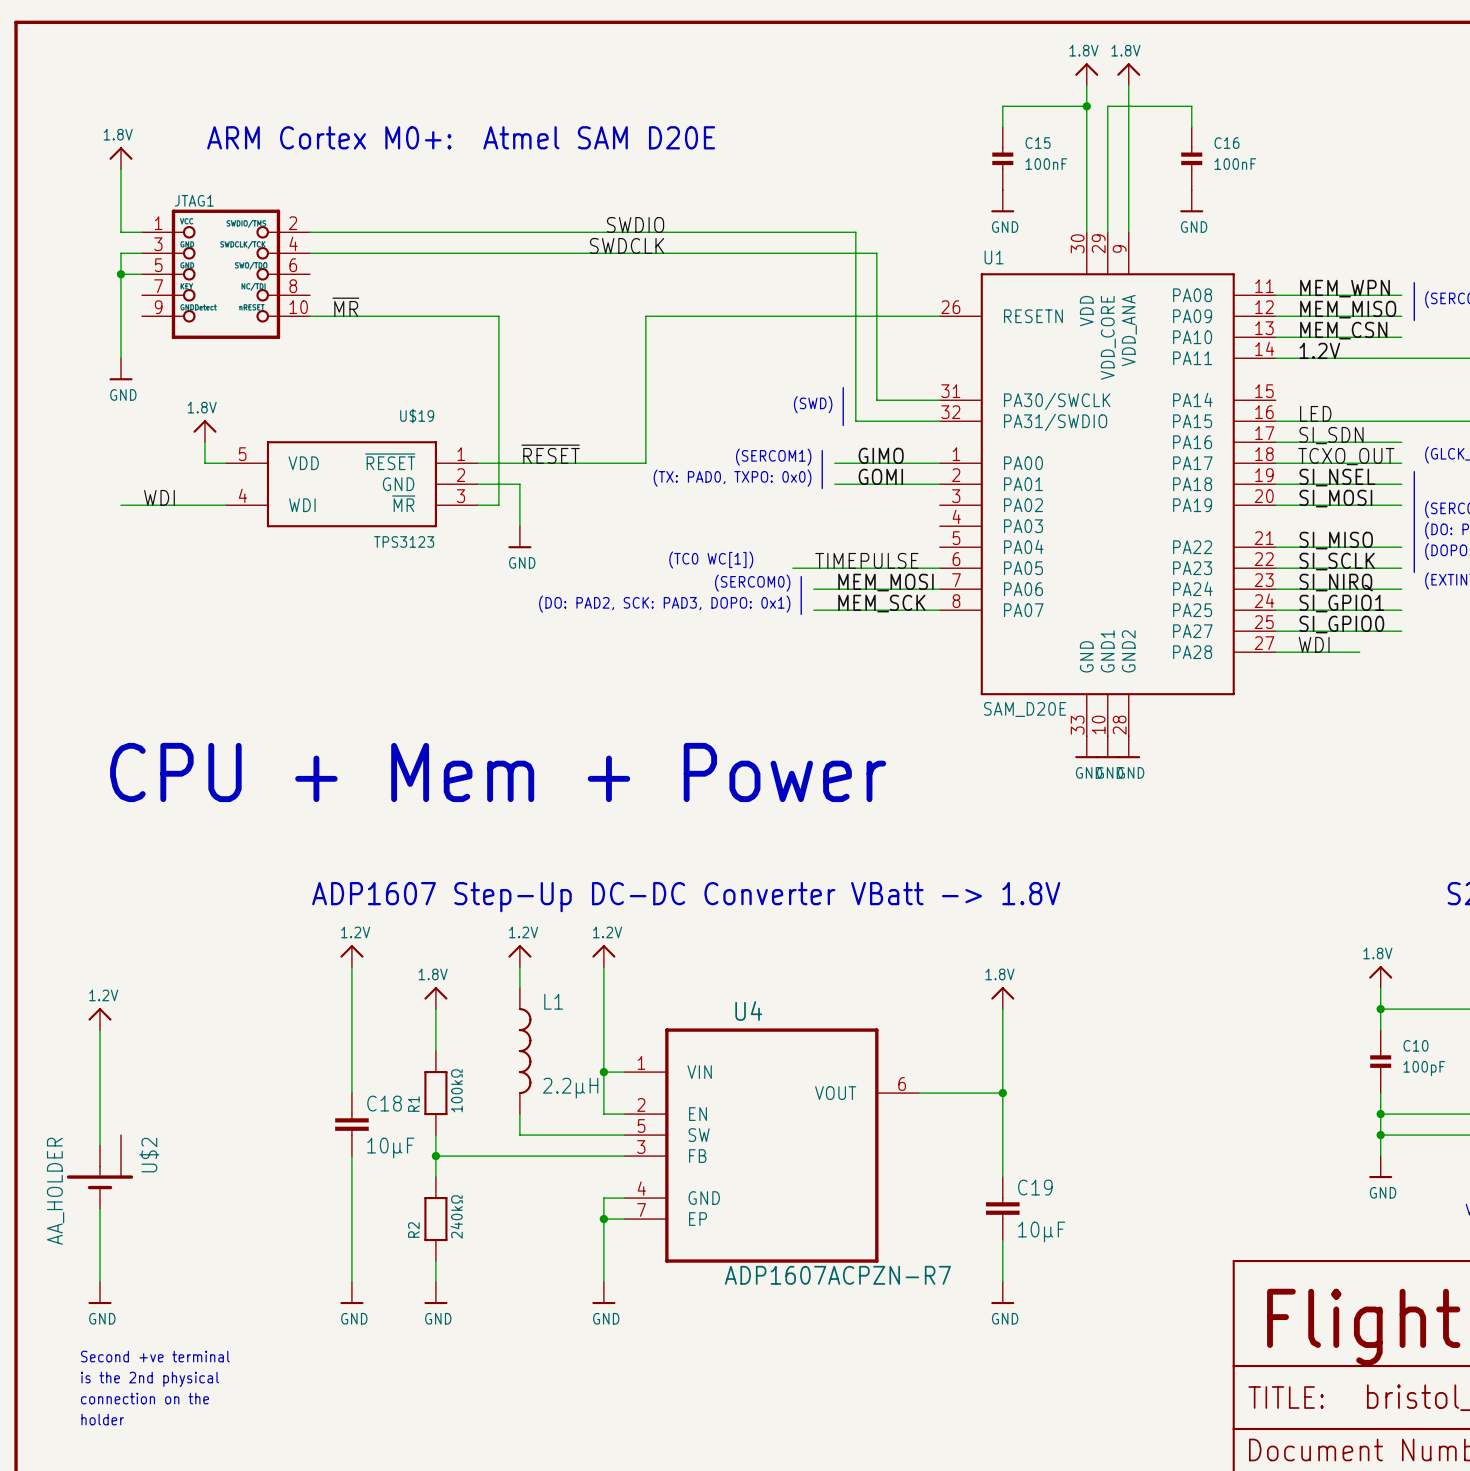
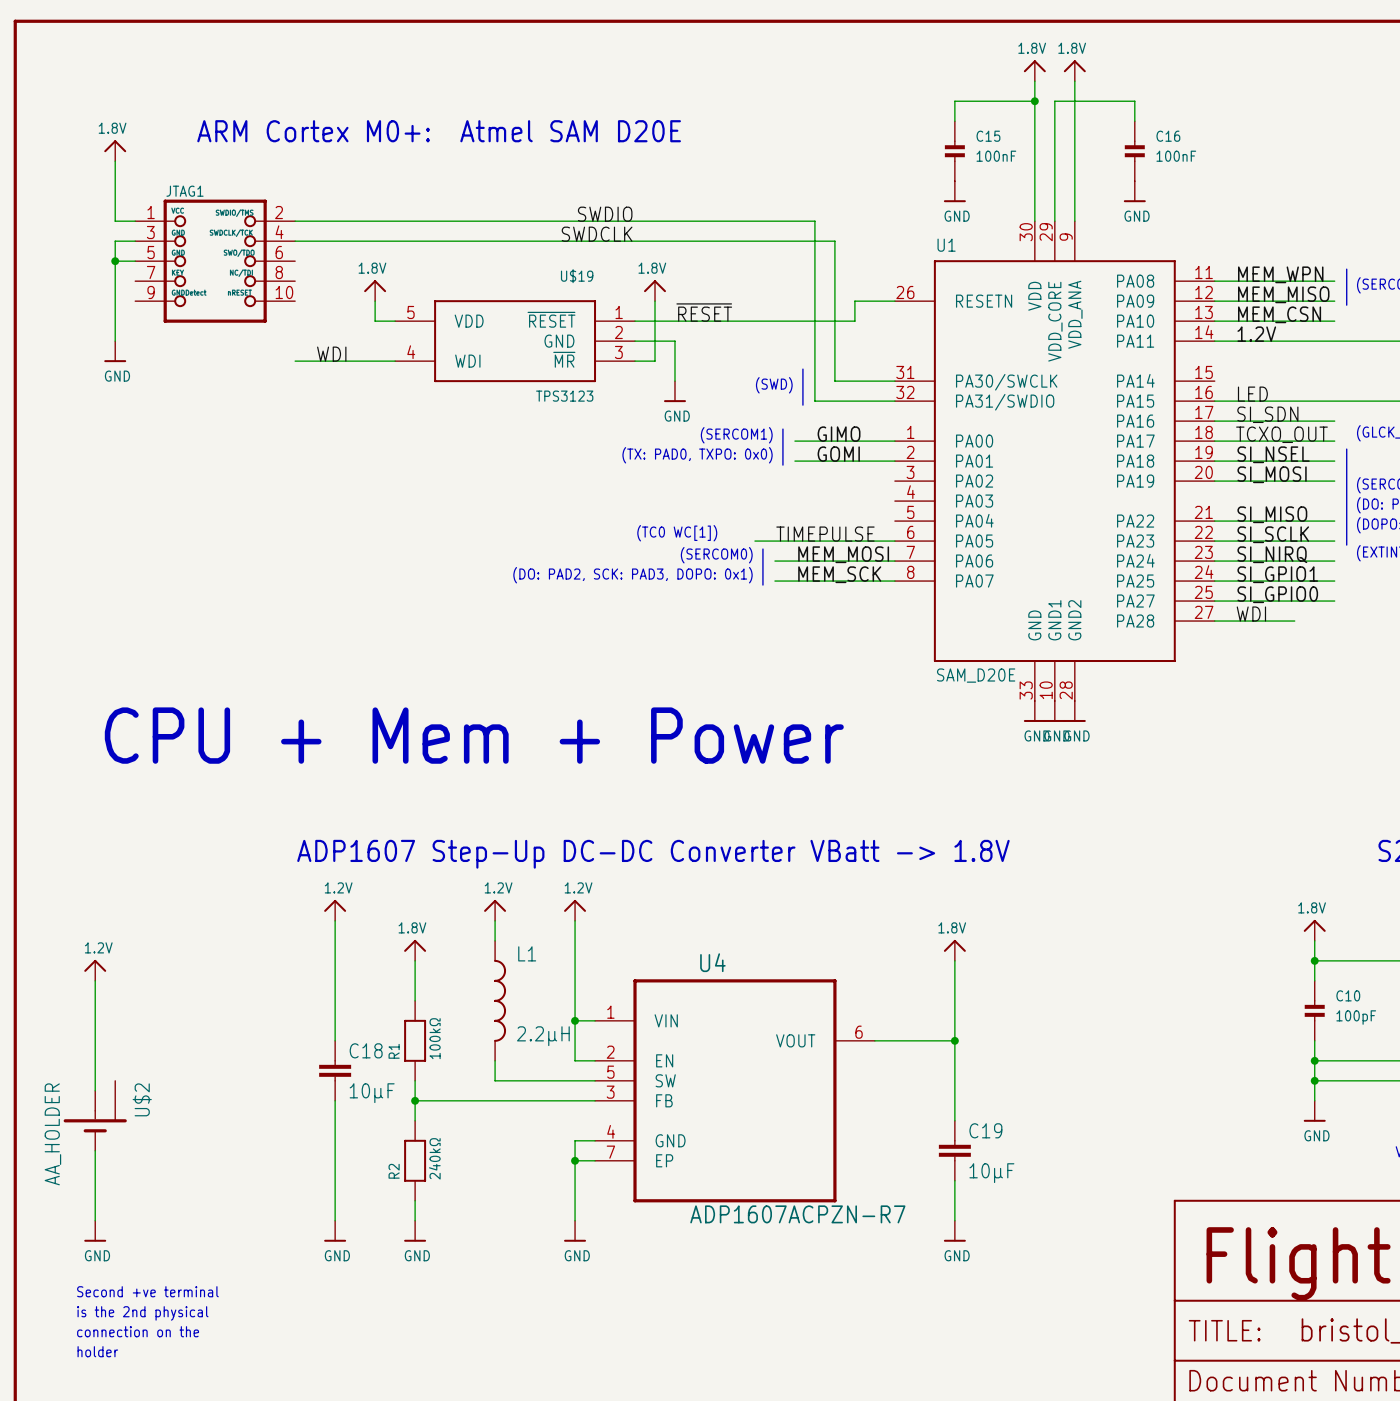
power symbol: none -> 1.8V (375, 290)
power symbol: none -> 1.8V (655, 290)
label: ~{MR} (345, 307) -> none
wire: (309, 316) (498, 316) (498, 505) (477, 505) -> none
wire: none -> (375, 301) (375, 321) (395, 321)
wire: none -> (655, 301) (655, 361) (635, 361)
wire: (897, 316) (645, 316) (645, 463) (477, 463) -> (854, 301) (854, 321) (635, 321)
label: none -> ~{RESET} (704, 312)
wire: none -> (635, 341) (674, 341) (674, 381)
label: none -> WDI (331, 354)
wire: none -> (295, 361) (395, 361)
power symbol: none -> GND (674, 391)
power symbol: 1.8V (204, 431) -> none
wire: (204, 442) (204, 463) (225, 463) -> none
label: ~{RESET} (550, 454) -> none
U$19 position: (351, 484) -> (515, 341)
wire: (477, 484) (519, 484) (519, 526) -> none
label: WDI (159, 497) -> none
wire: (121, 505) (225, 505) -> none
power symbol: GND (519, 537) -> none

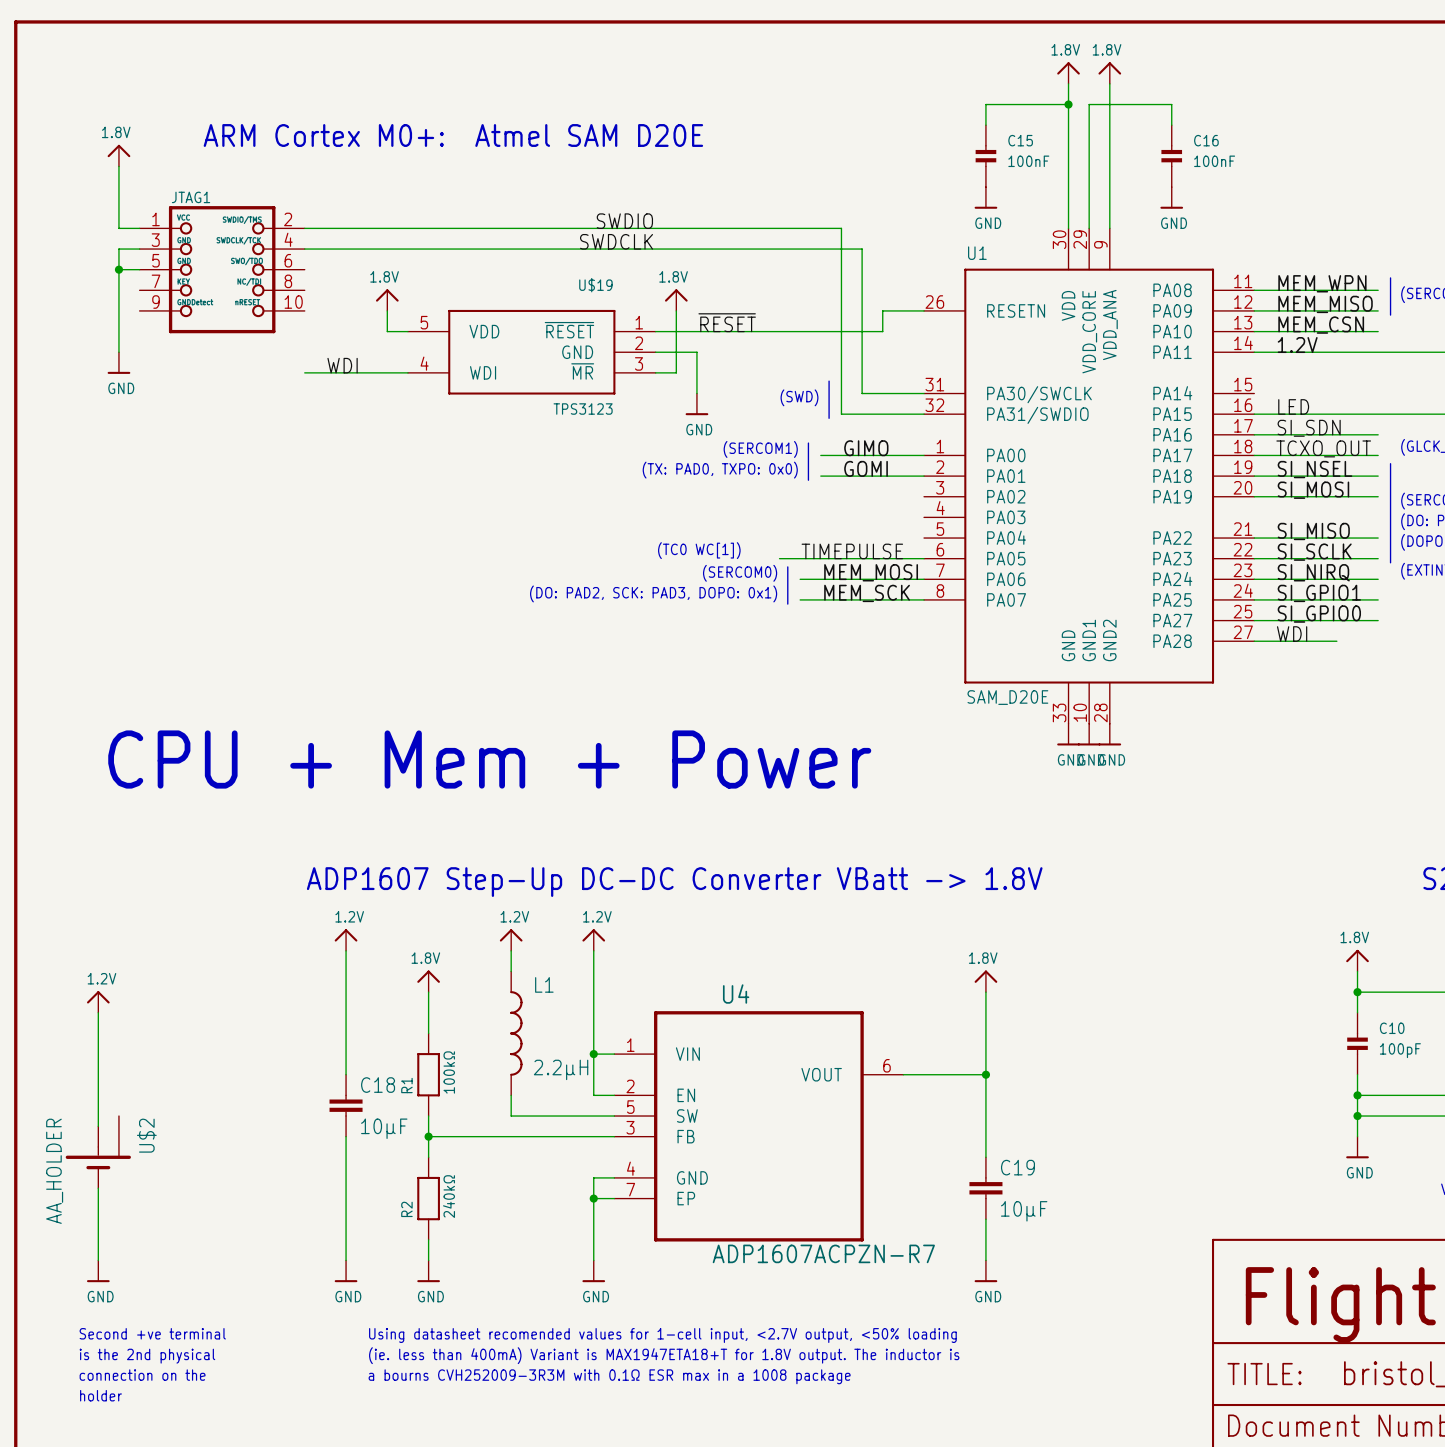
text: none -> Using datasheet recomended values for 1-cell input, <2.7V output, <50% loading (662, 1335)
text: none -> (ie. less than 400mA) Variant is MAX1947ETA18+T for 1.8V output. The inductor is (664, 1355)
text: none -> a bourns CVH252009-3R3M with 0.1Ω ESR max in a 1008 package (609, 1376)

